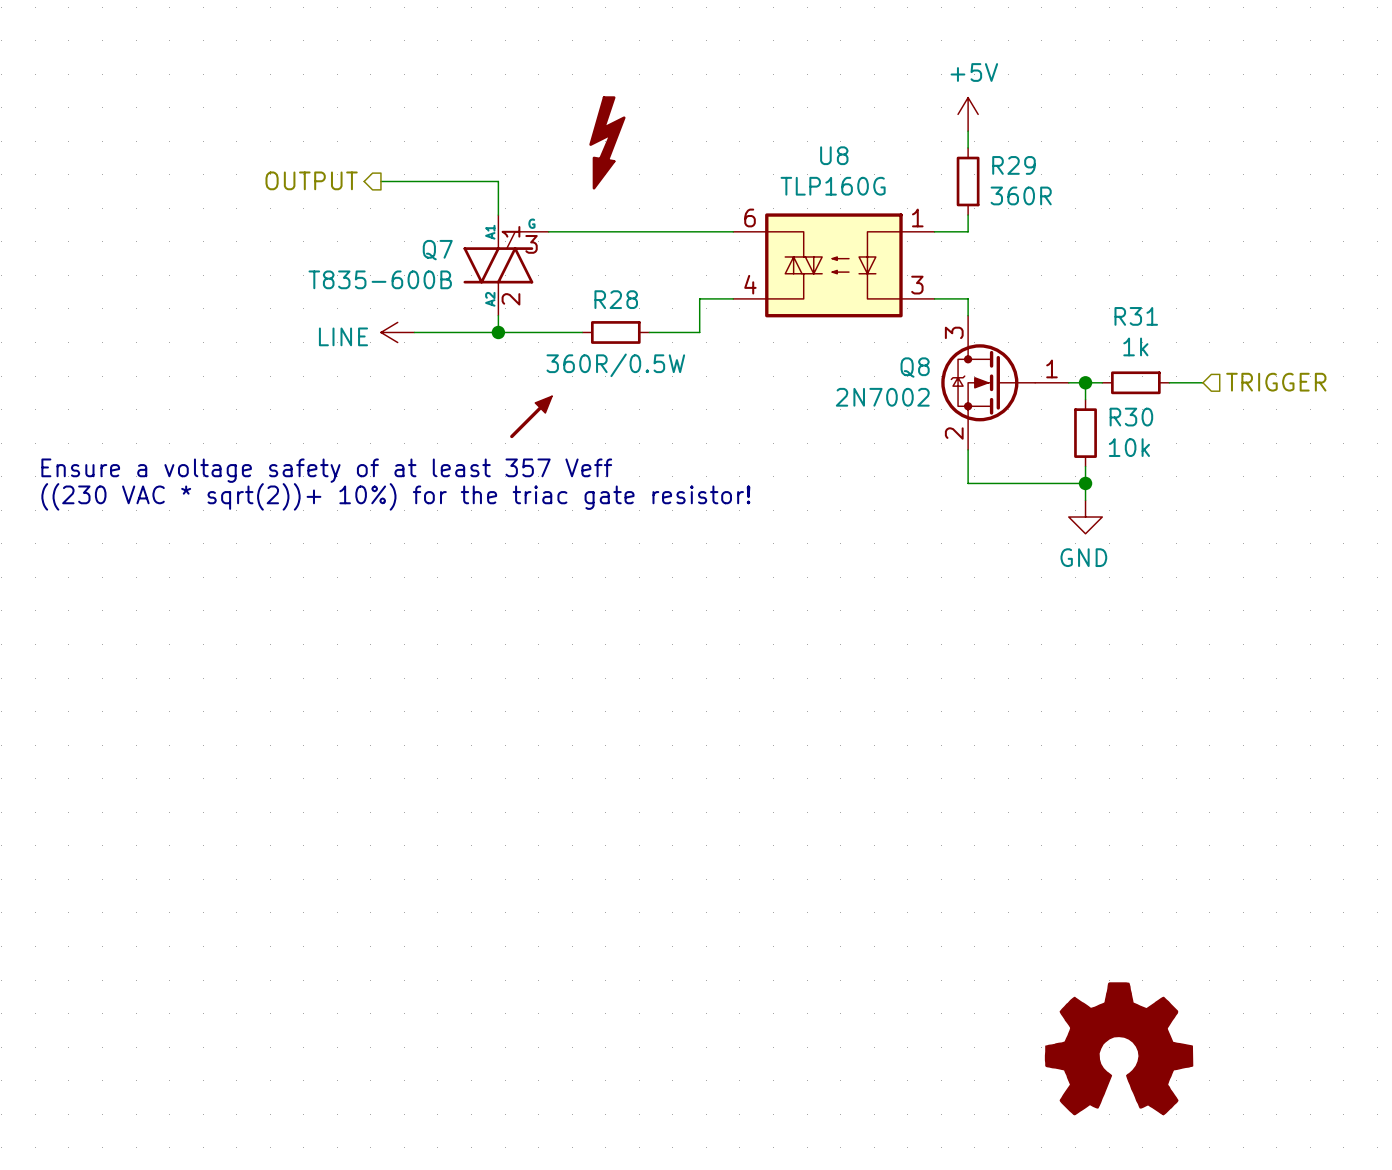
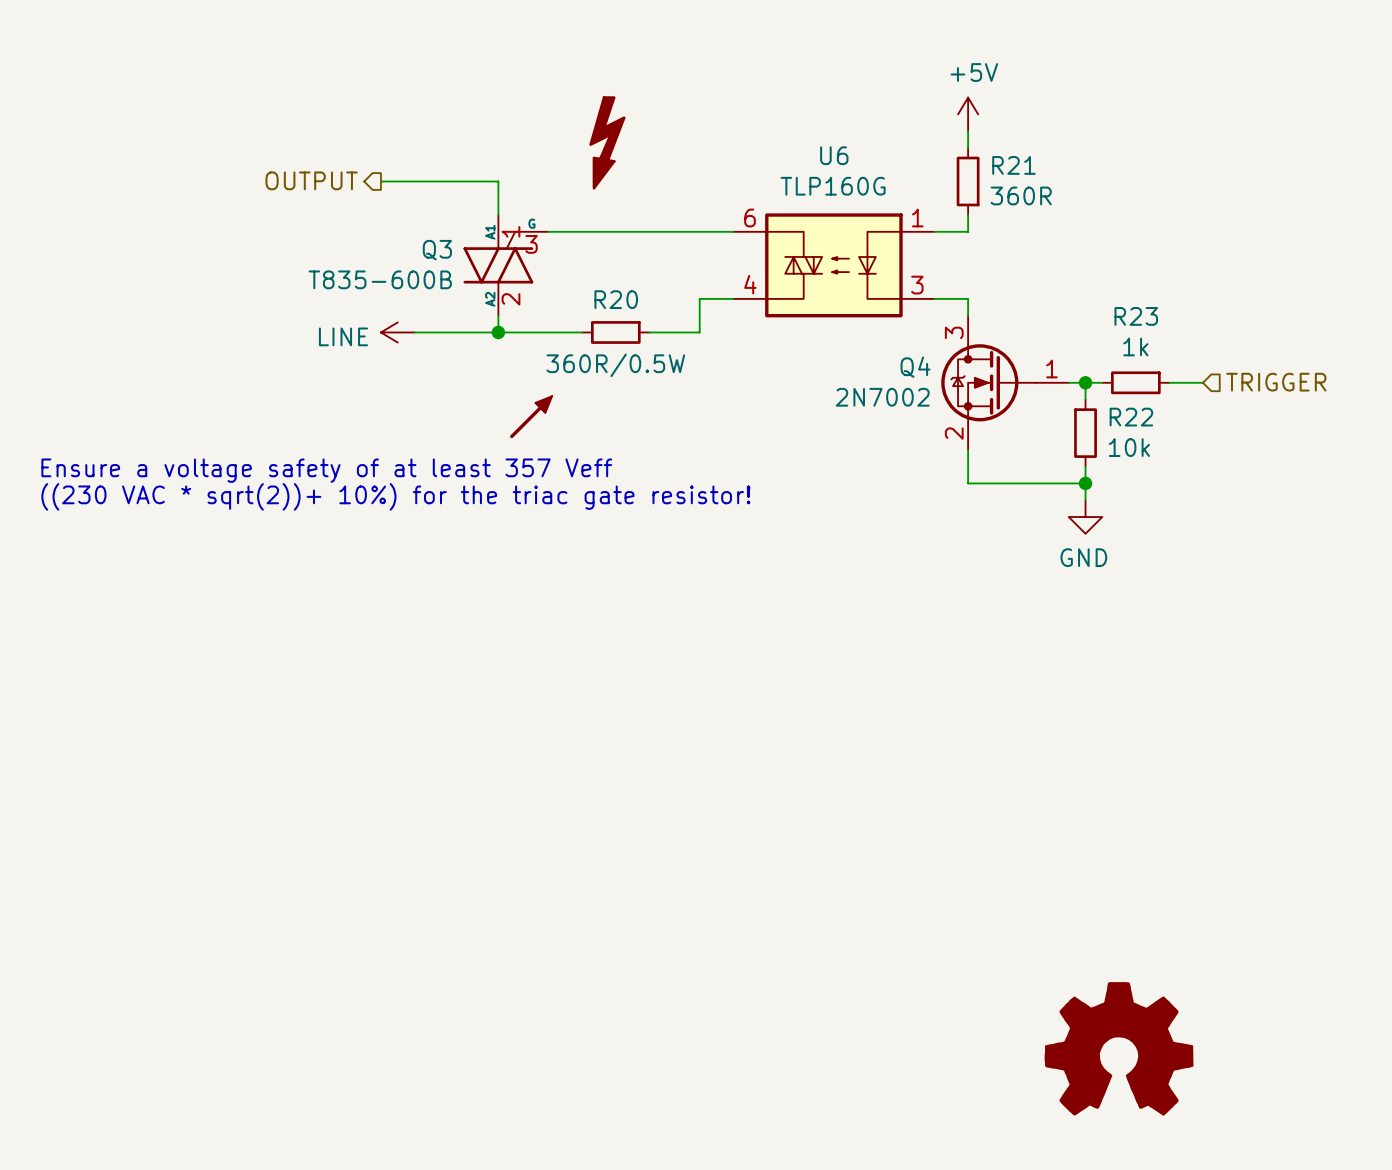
U8 name: U8 (834, 155) -> U6 (834, 155)
R29 name: R29 (1013, 165) -> R21 (1013, 165)
Q7 name: Q7 (437, 250) -> Q3 (437, 250)
R28 name: R28 (616, 299) -> R20 (616, 299)
R31 name: R31 (1136, 316) -> R23 (1136, 316)
Q8 name: Q8 (915, 367) -> Q4 (915, 367)
R30 name: R30 (1131, 417) -> R22 (1131, 417)

